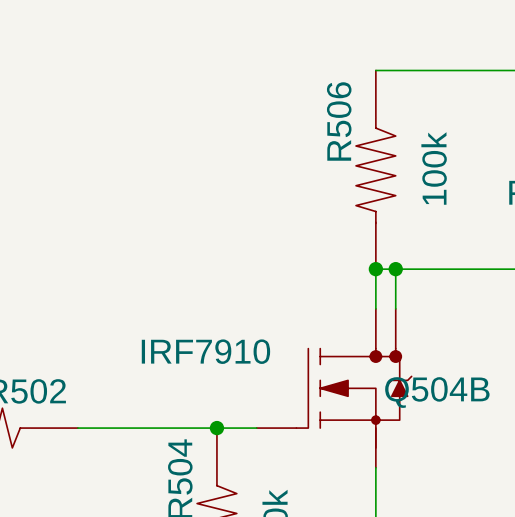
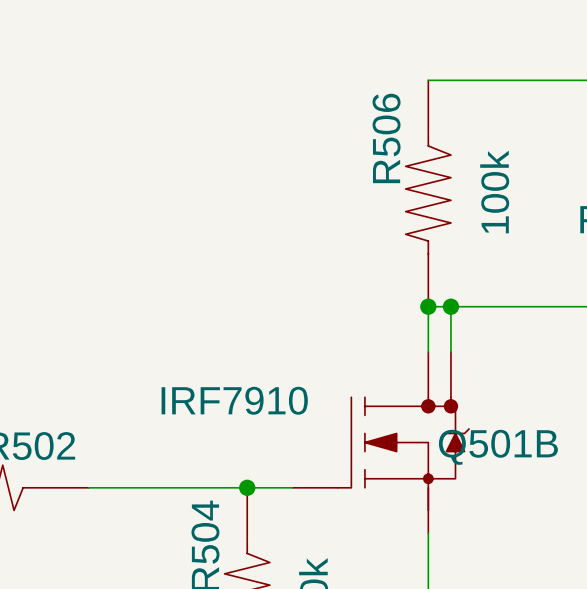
Q504B name: Q504B (437, 392) -> Q501B (498, 447)

